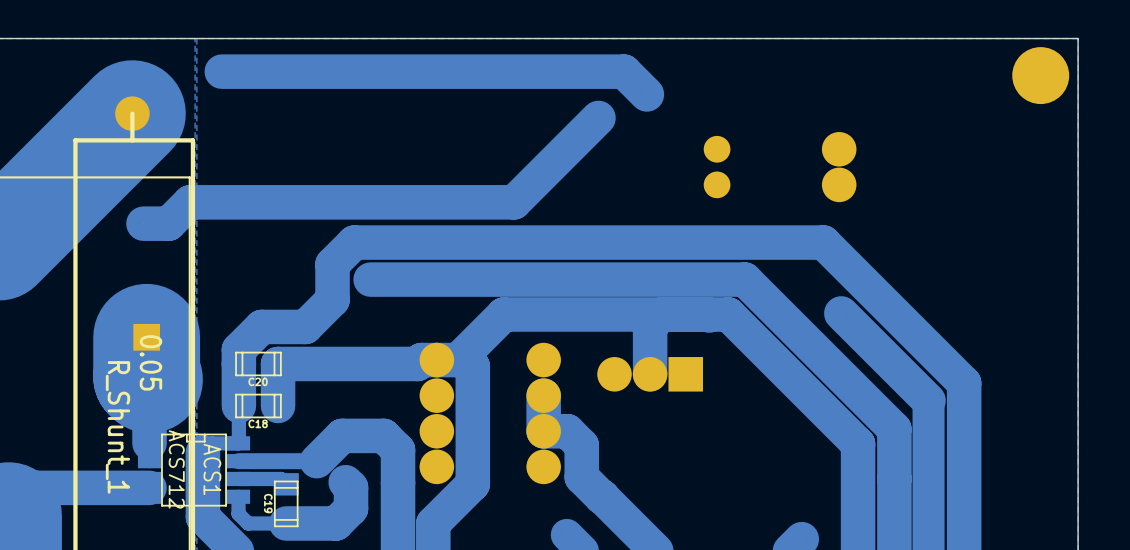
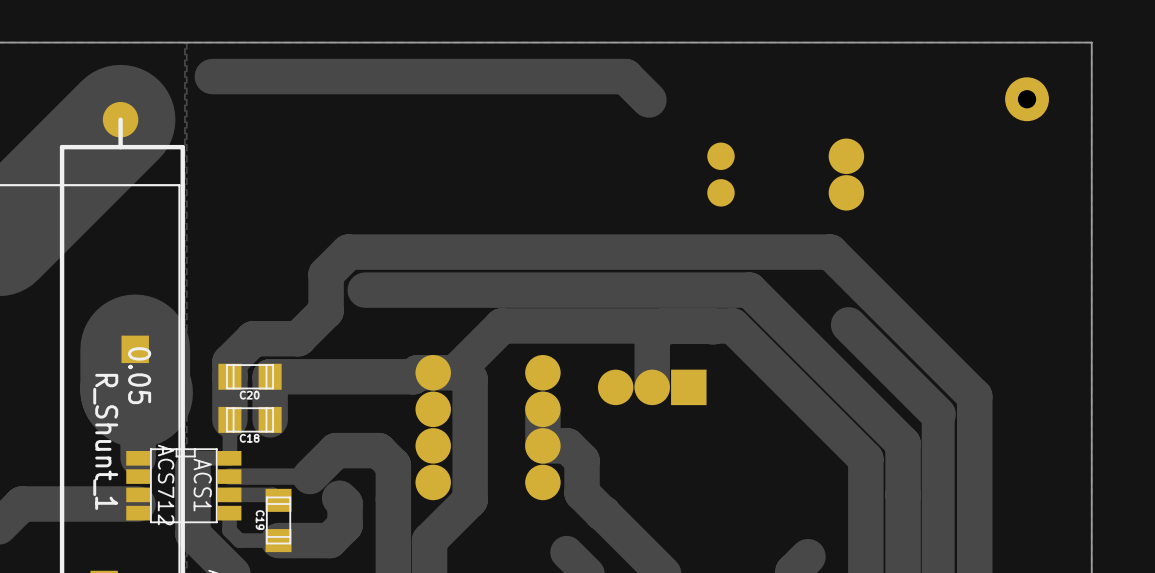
part: (1040, 75) -> none
part: none -> (1027, 99)
track: (598, 117) (514, 202) (190, 202) (168, 223) (143, 223) -> none

